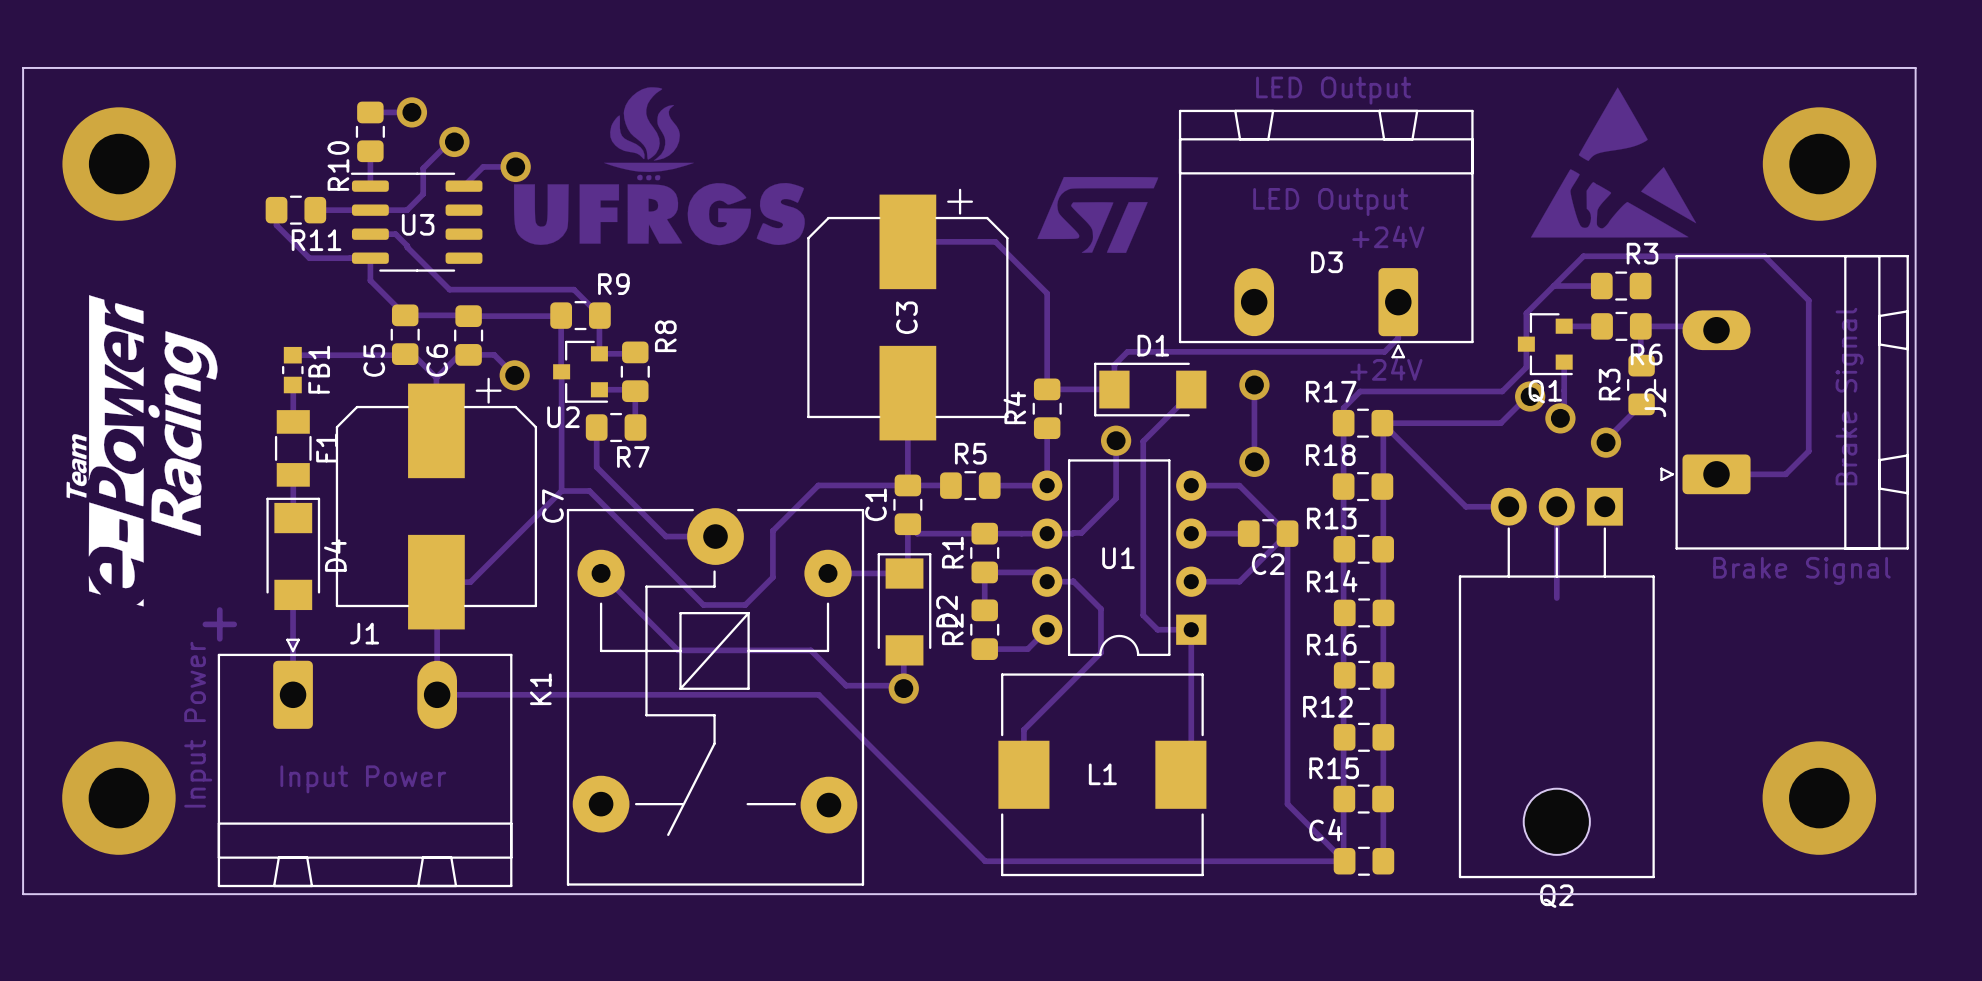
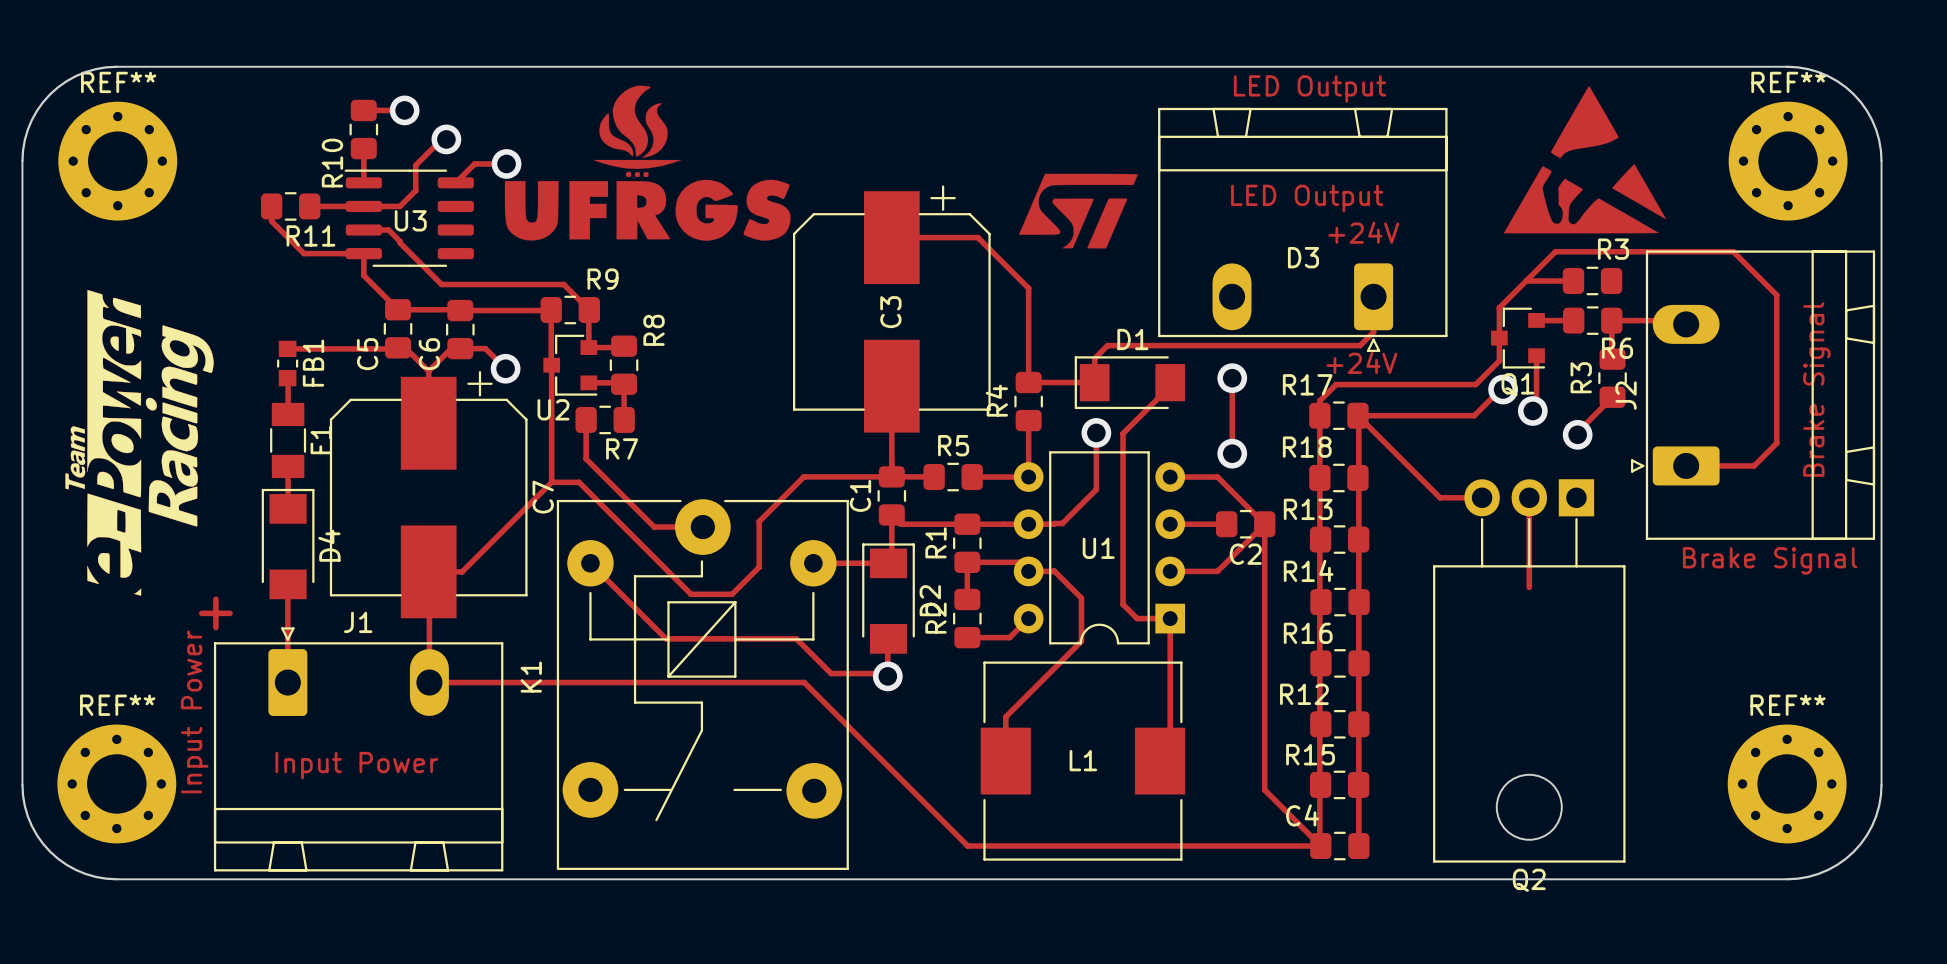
board edge: (118, 67) (23, 67) (23, 894) (1915, 894) (1915, 67) (1819, 67) -> (116, 66) (85, 72) (66, 81) (50, 94) (31, 120) (24, 140) (22, 161) (23, 795) (31, 825) (50, 851) (75, 869) (95, 876) (116, 879) (1787, 879) (1808, 876) (1828, 869) (1853, 851) (1867, 835) (1876, 816) (1880, 795) (1881, 161) (1876, 129) (1867, 110) (1853, 94) (1828, 76) (1808, 69) (1787, 66)
via: (119, 164) -> none
REF**: none -> (117, 161)
via: (1819, 164) -> none
REF**: none -> (1788, 161)
via: (118, 798) -> none
REF**: none -> (116, 783)
via: (1819, 798) -> none
REF**: none -> (1787, 783)

